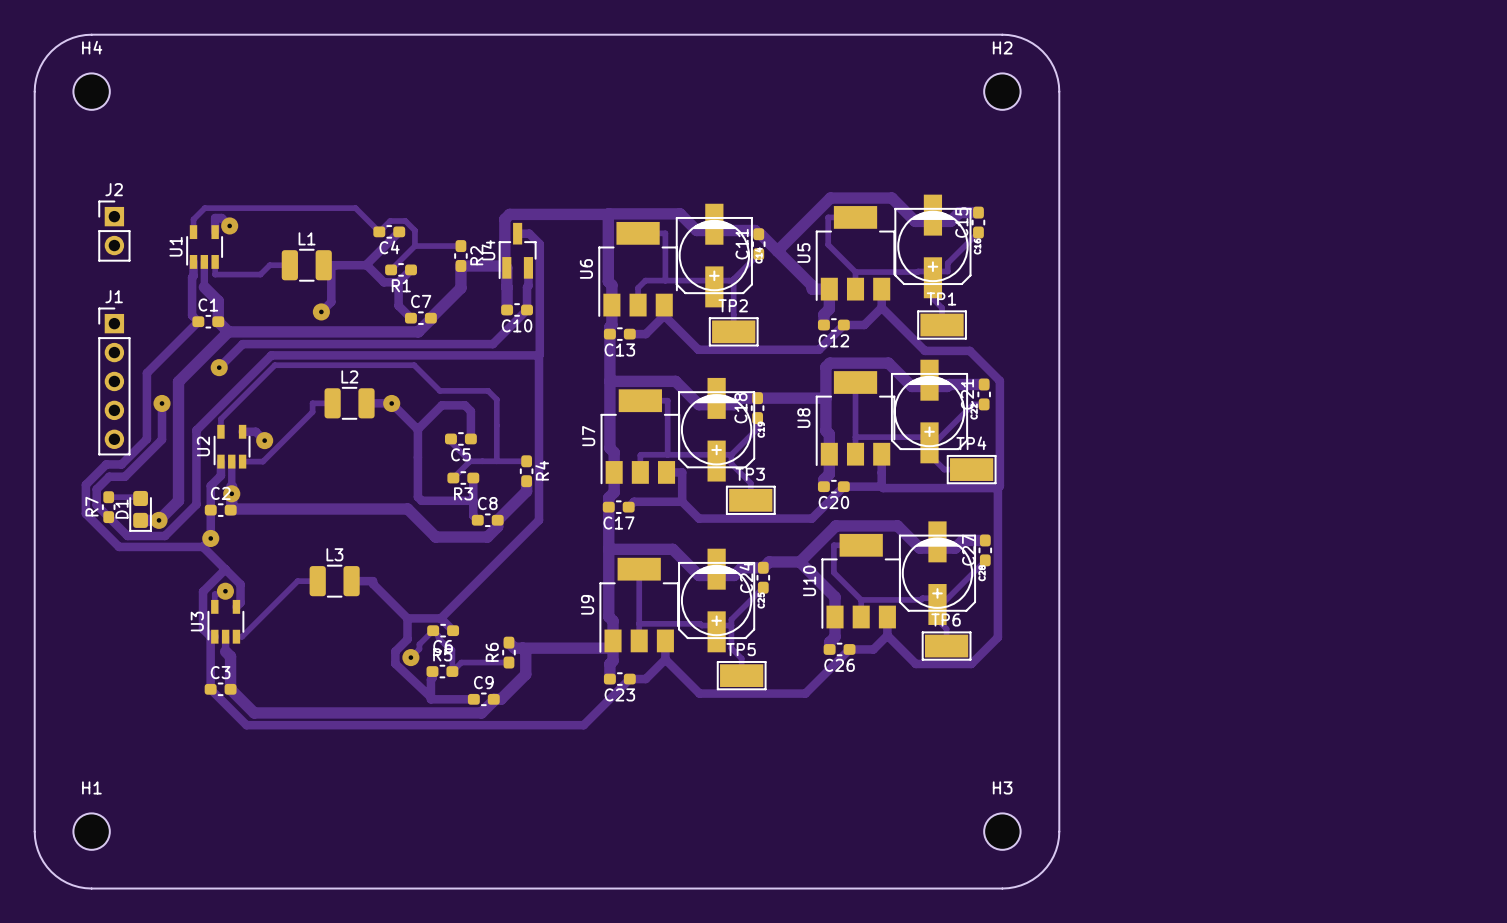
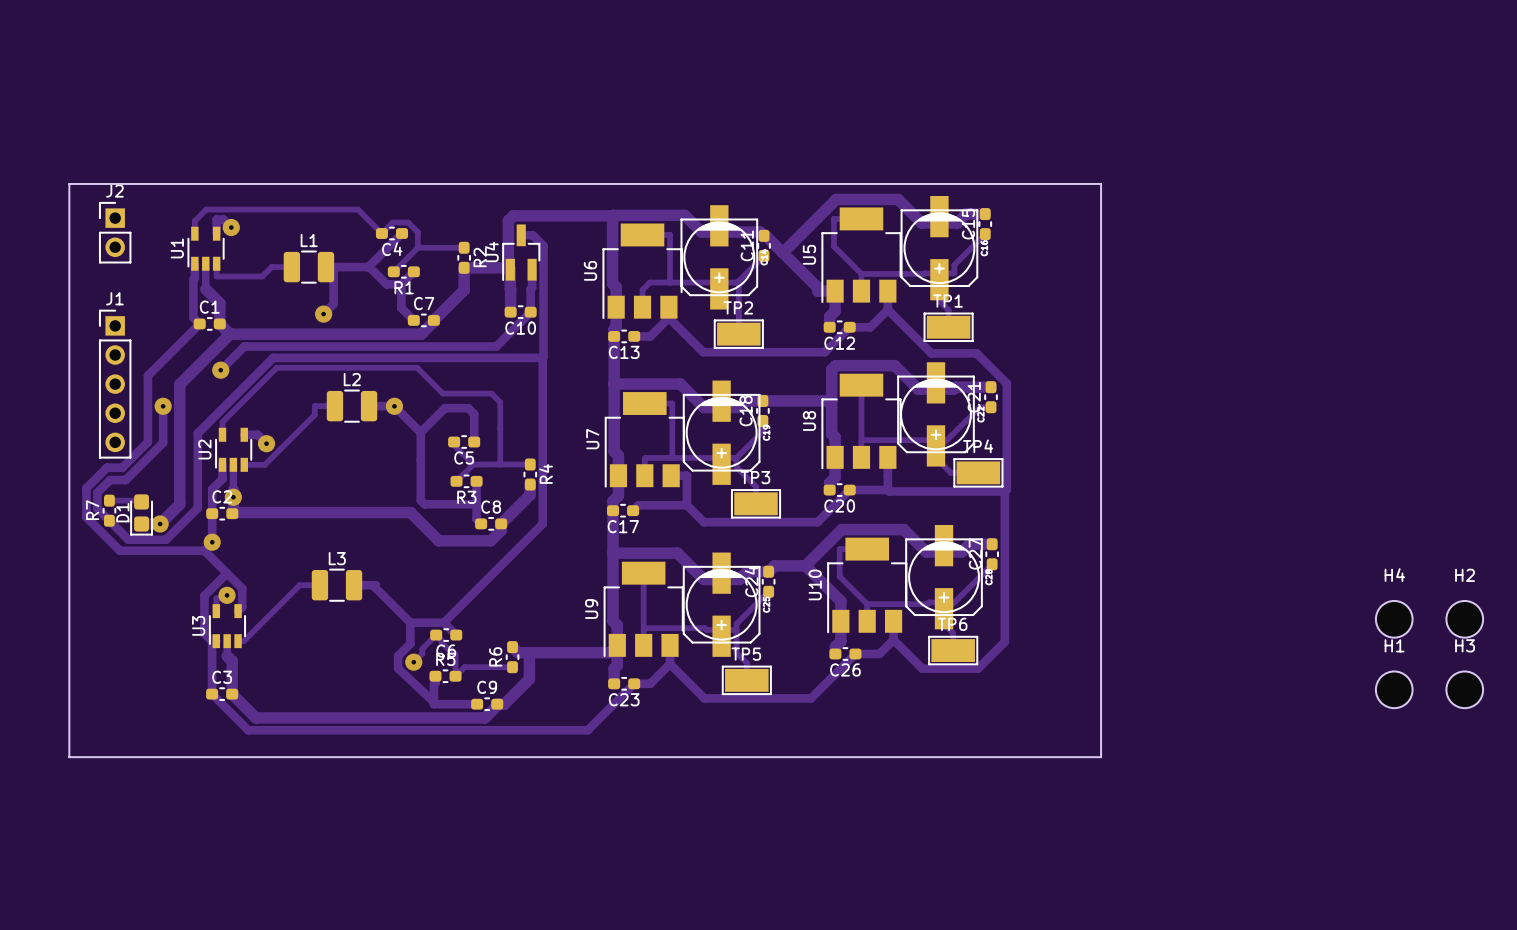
board edge: (91, 34) (1002, 34) (1021, 37) (1037, 47) (1053, 66) (1059, 91) (1059, 831) (1056, 850) (1046, 867) (1027, 882) (1002, 888) (91, 888) (72, 885) (56, 876) (40, 856) (34, 831) (34, 91) (37, 72) (51, 51) (72, 37) (91, 34) -> (69, 183) (69, 757) (1101, 757) (1101, 183) (69, 183)
H4 position: (91, 91) -> (1394, 619)
H2 position: (1002, 91) -> (1464, 619)
H1 position: (91, 831) -> (1394, 689)
H3 position: (1002, 831) -> (1464, 689)

